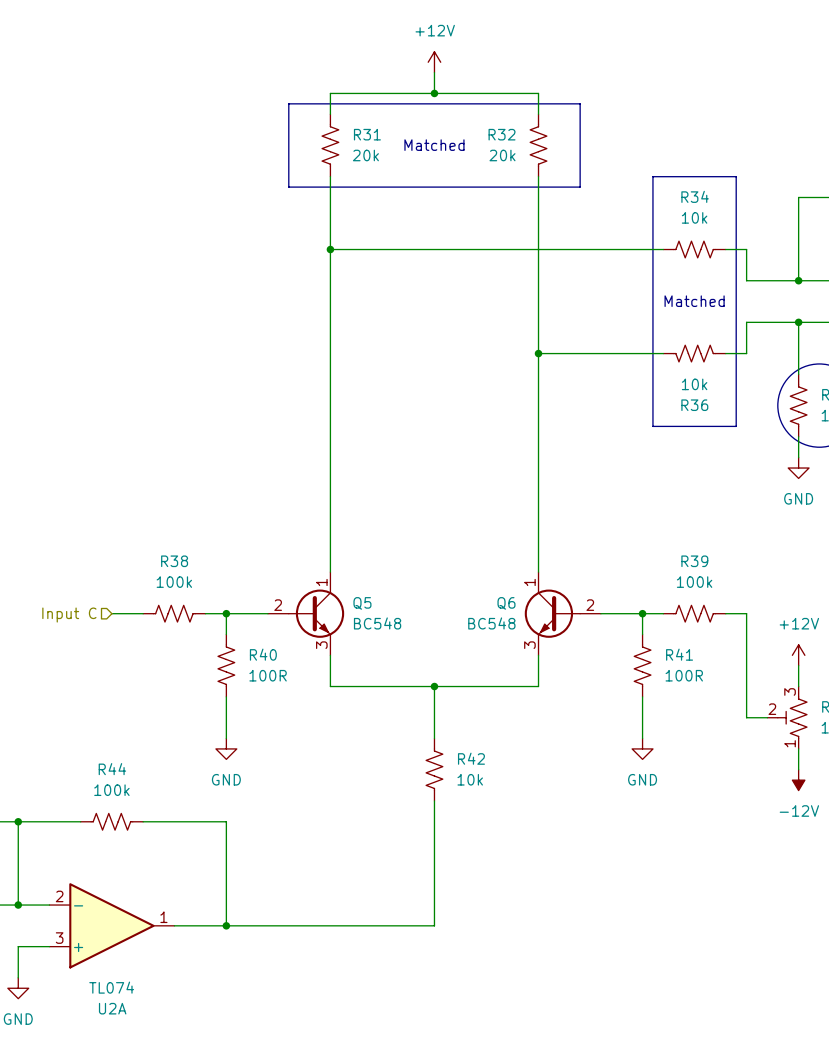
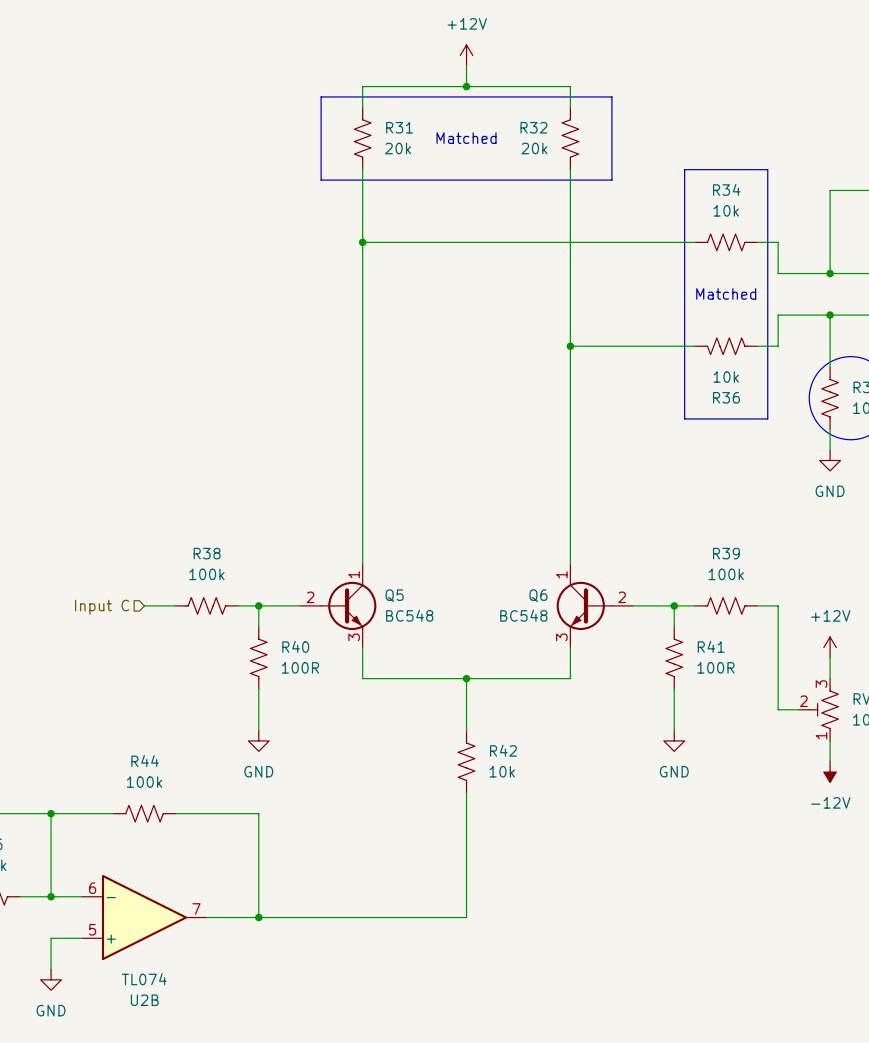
U2A pin number: 2 (59, 896) -> 6 (92, 888)
U2A pin number: 1 (163, 917) -> 7 (196, 908)
U2A pin number: 3 (59, 938) -> 5 (92, 929)
U2A name: U2A (112, 1008) -> U2B (144, 1000)

